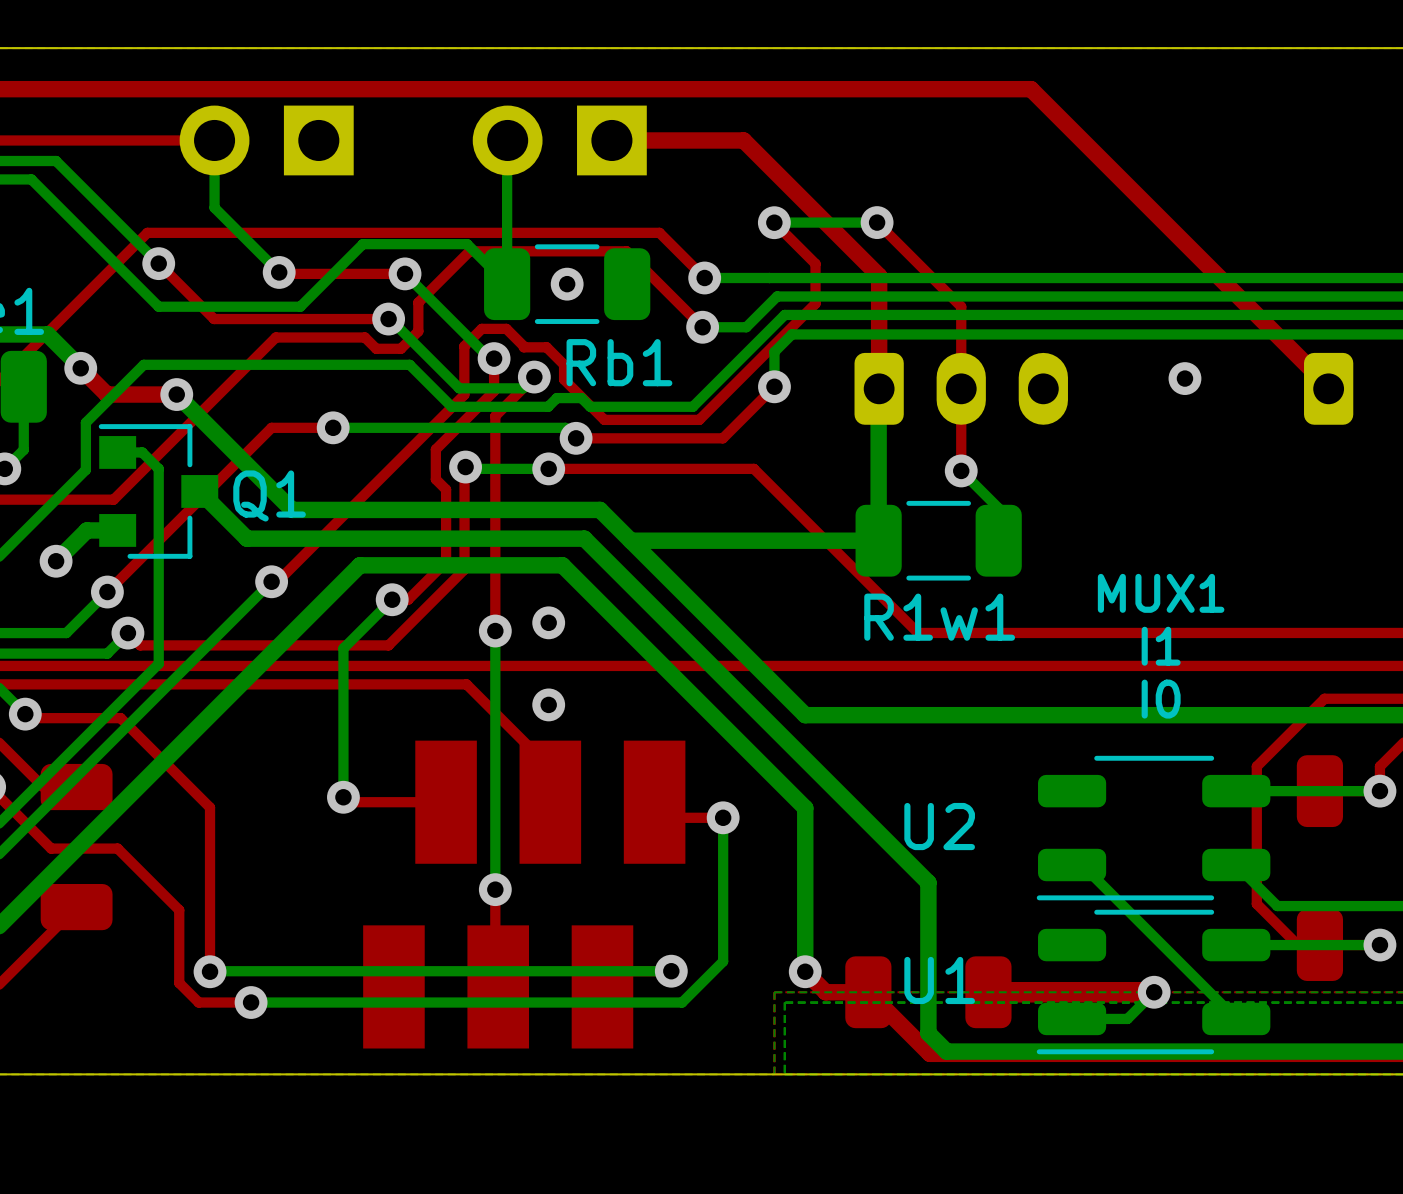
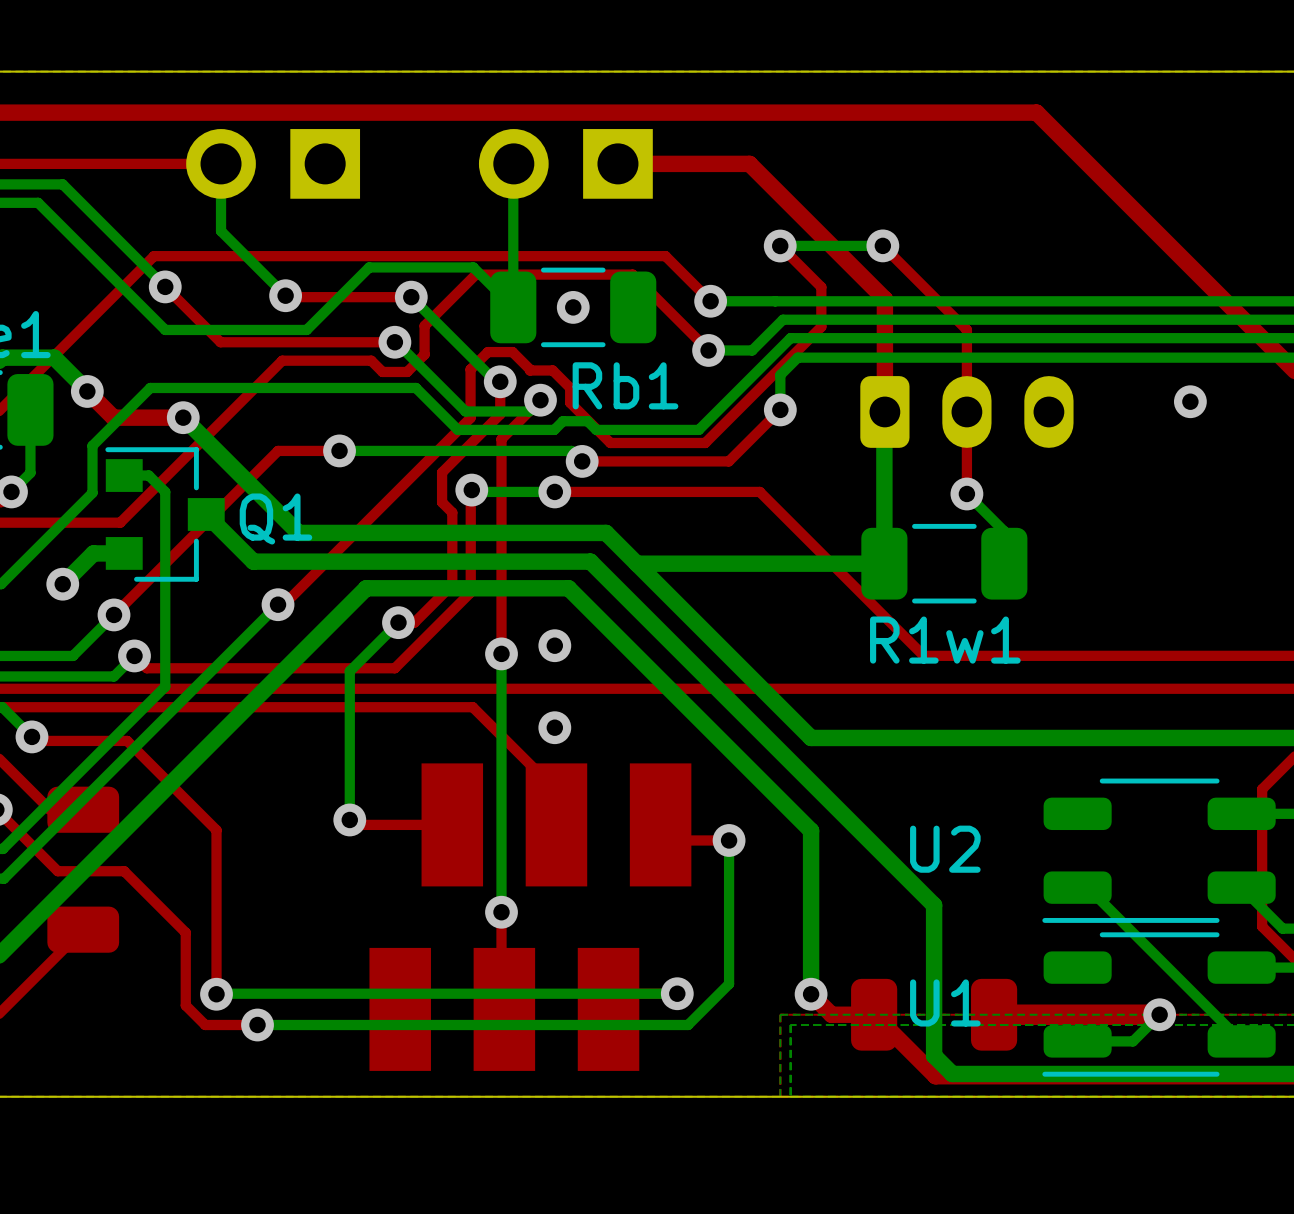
text: MUX1 (1161, 593) -> none
text: I1 (1161, 646) -> none
text: I0 (1161, 699) -> none

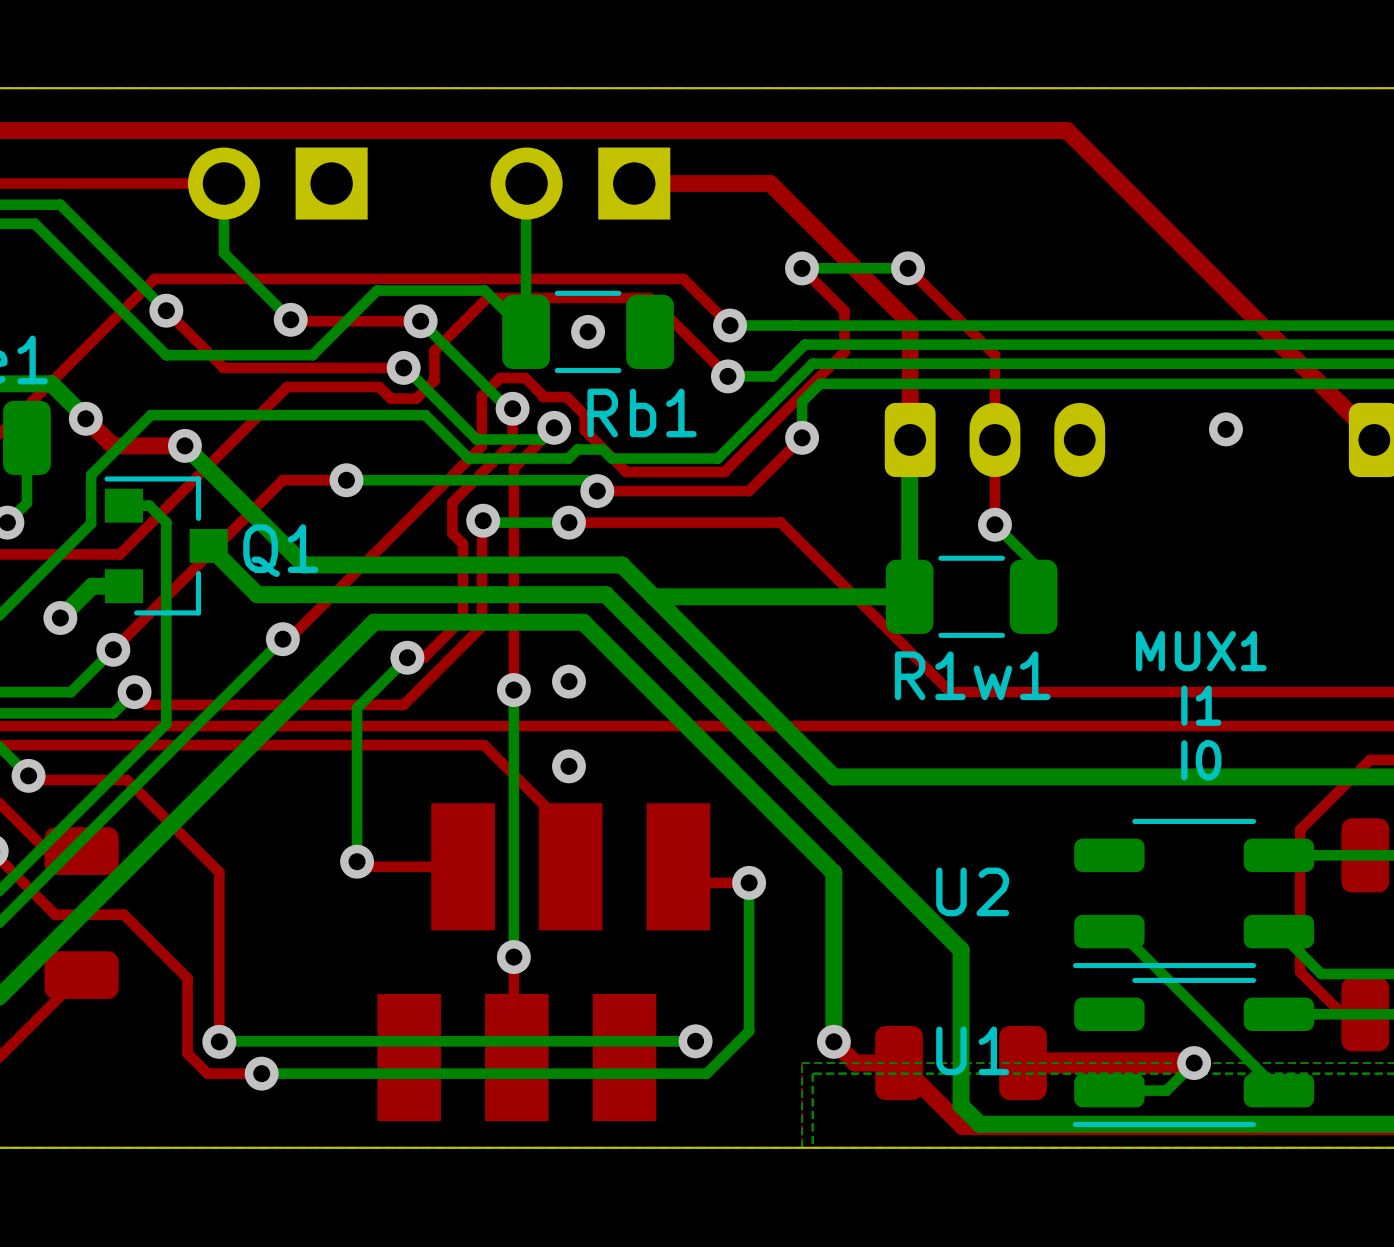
text: none -> MUX1 (1201, 651)
text: none -> I1 (1201, 705)
text: none -> I0 (1201, 760)

